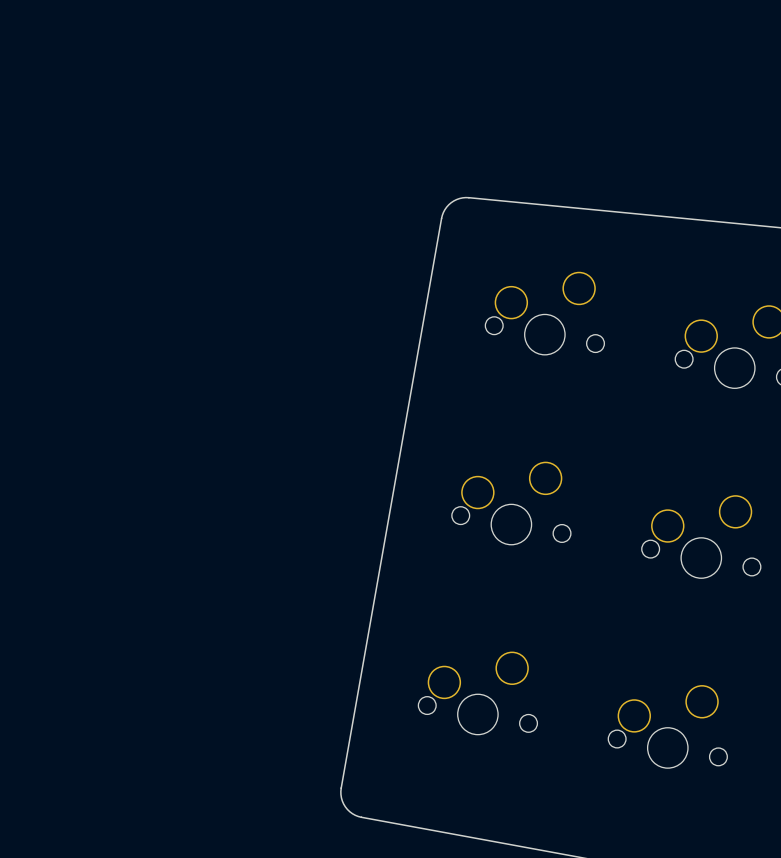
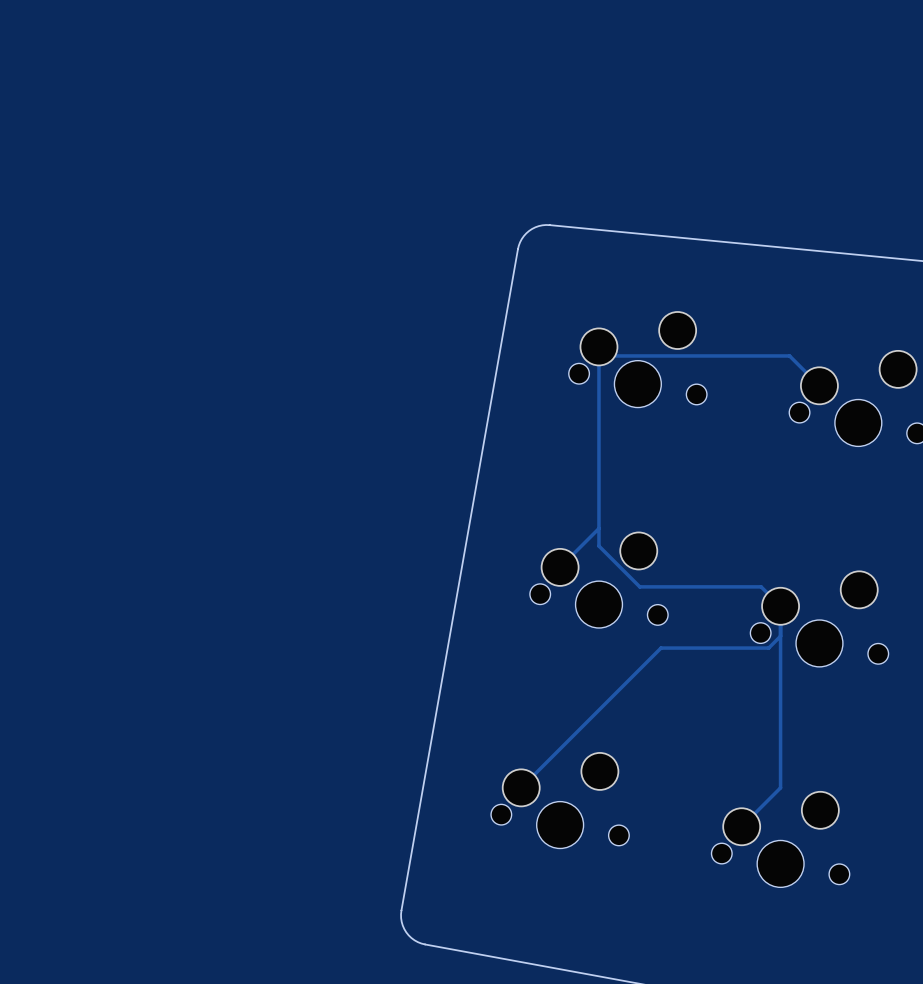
track: none -> (819, 385) (789, 355) (608, 355) (598, 346) (598, 546) (639, 586) (761, 586) (780, 606) (780, 787) (741, 826)
track: none -> (598, 528) (560, 567)
track: none -> (780, 636) (768, 648) (661, 648) (521, 787)

